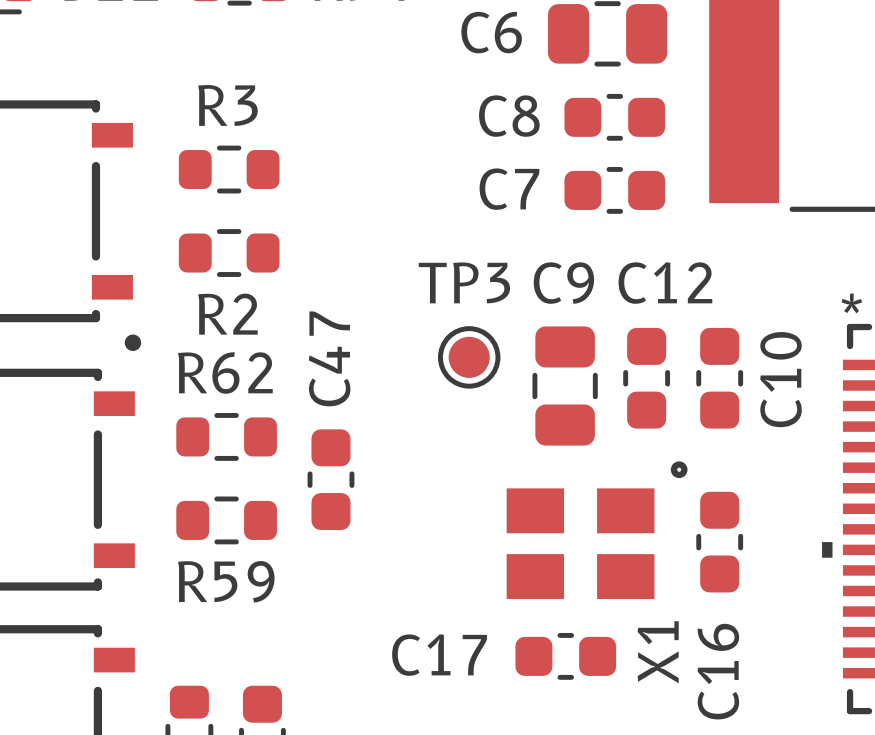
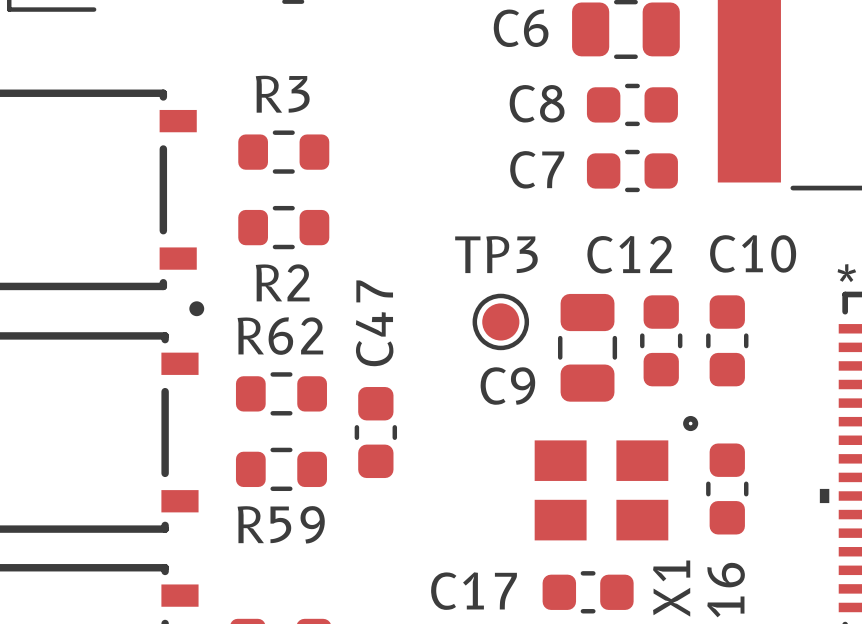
C9 name position: C9 (563, 283) -> C9 (507, 386)
C12 name position: C12 (665, 283) -> C12 (629, 254)
C10 name rotation: 0° (781, 379) -> 90° clockwise (753, 253)

